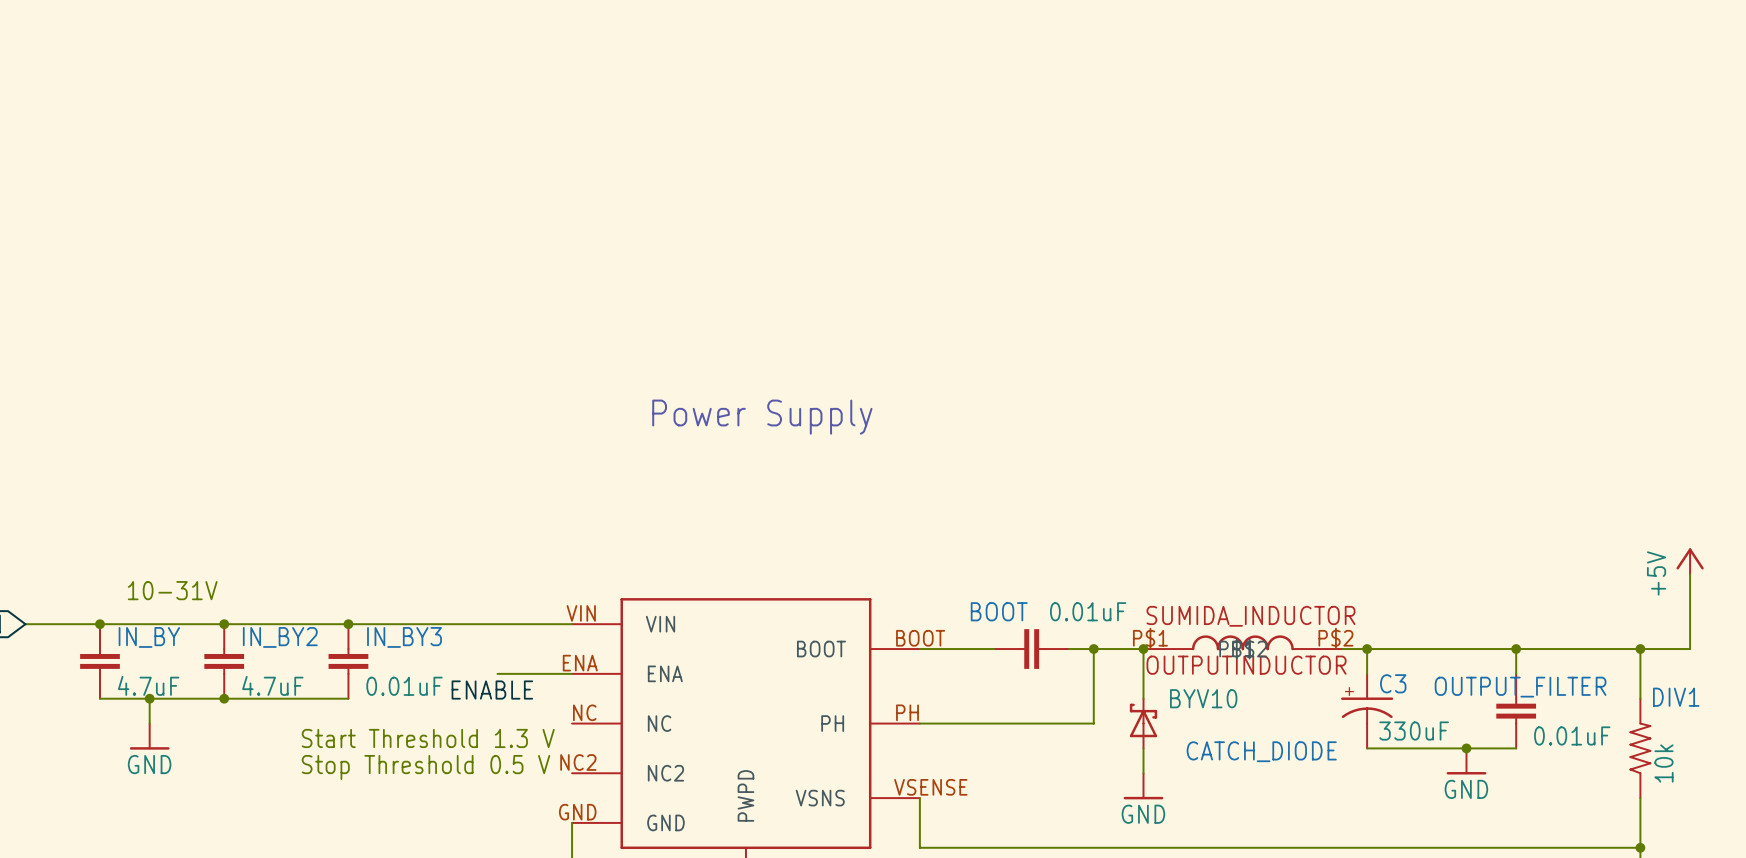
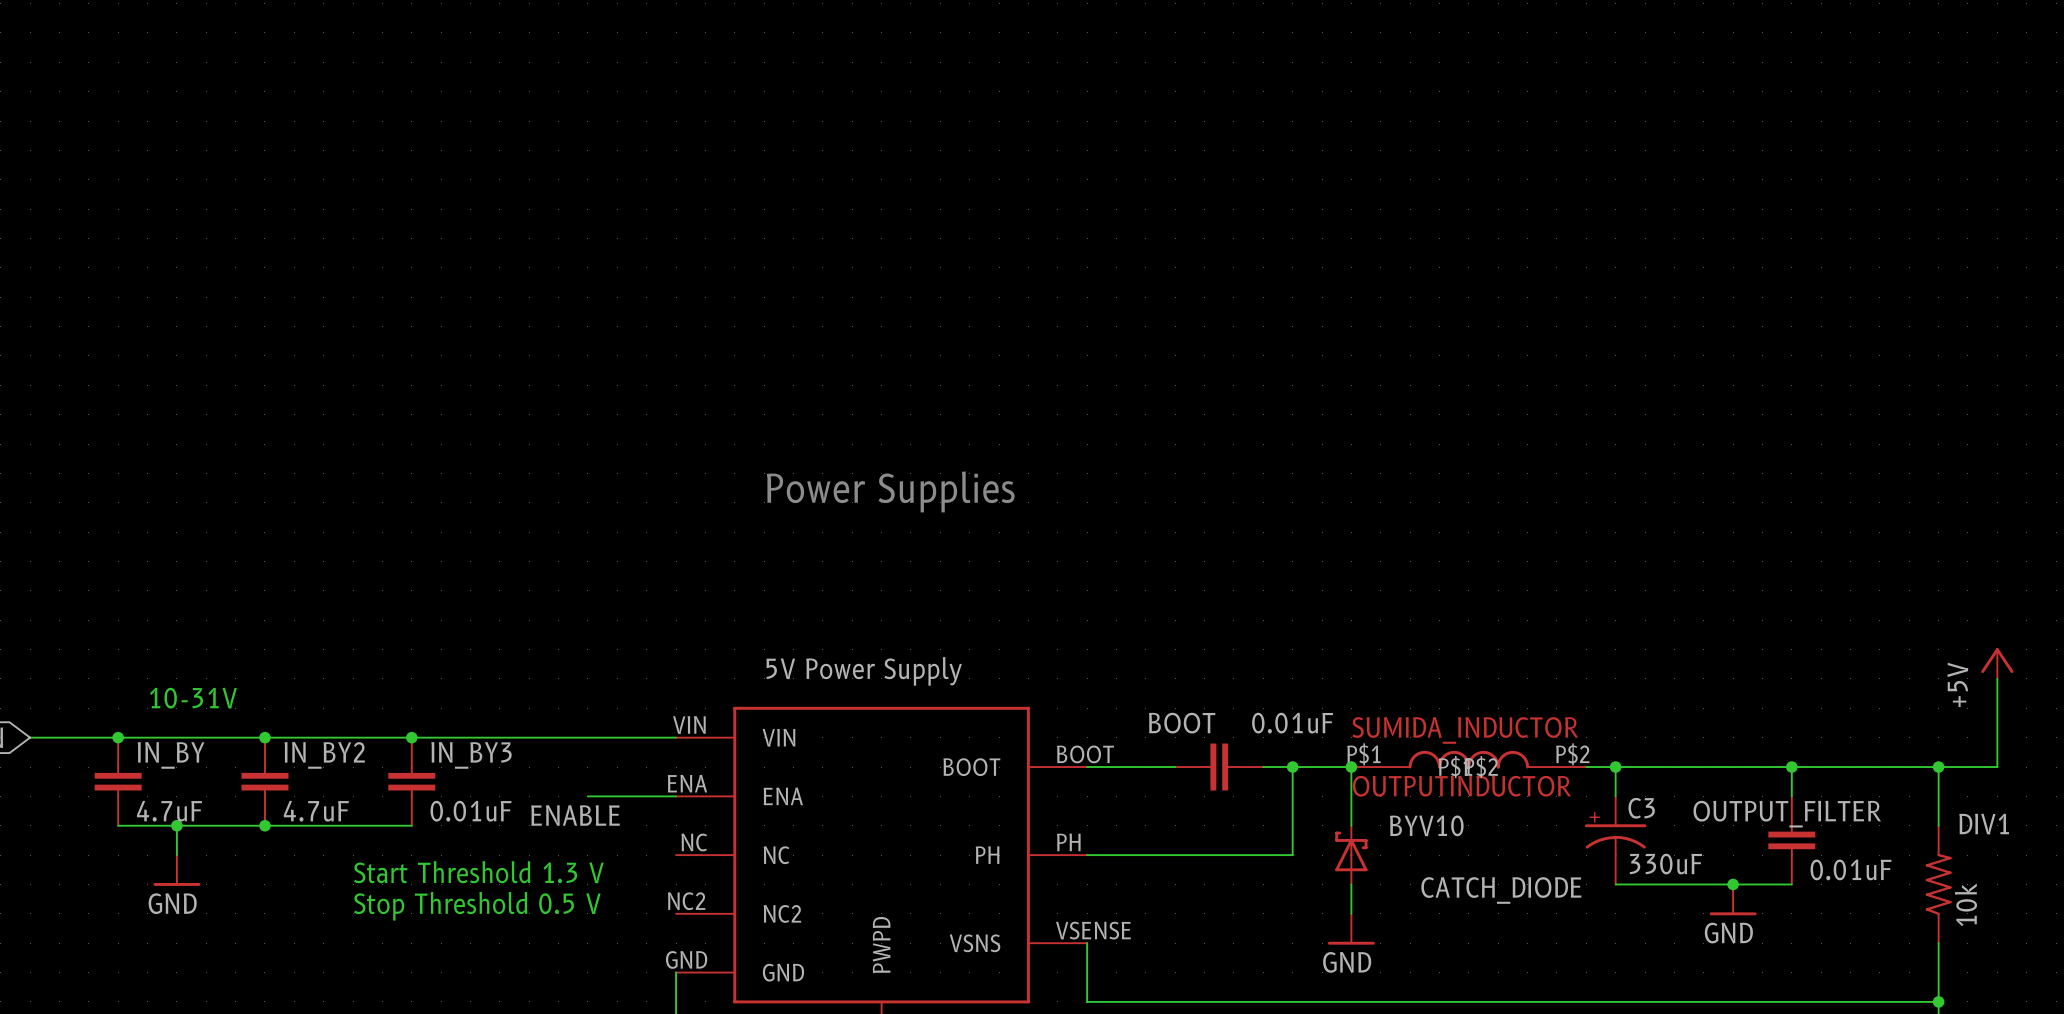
text: Power Supply (762, 417) -> Power Supplies (890, 491)
text: none -> 5V Power Supply (864, 671)

